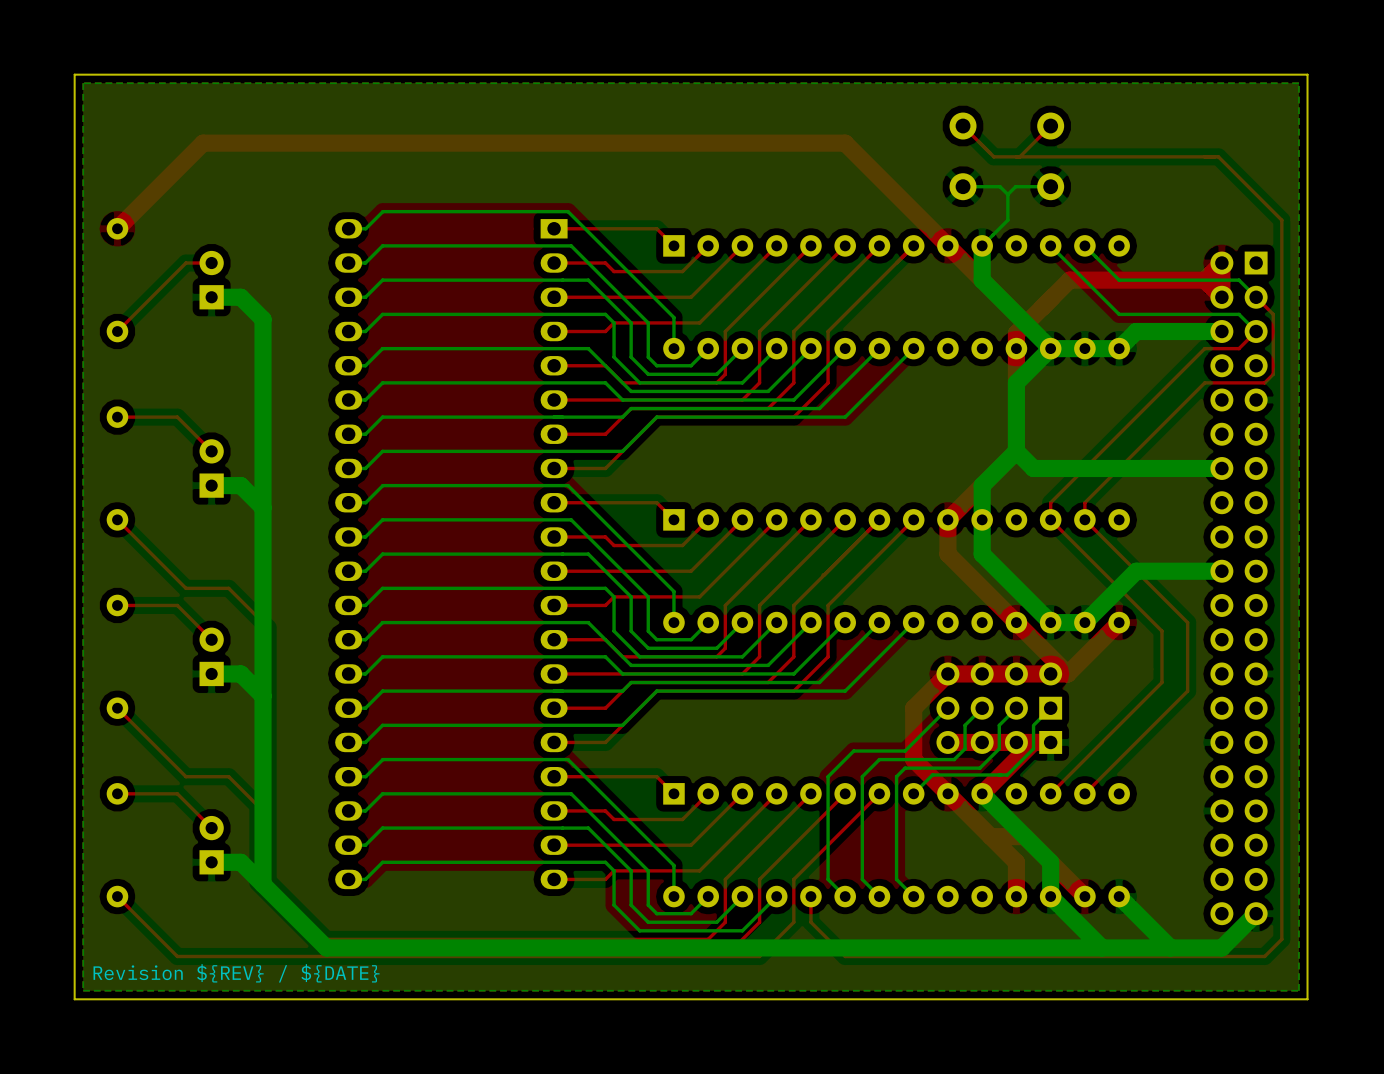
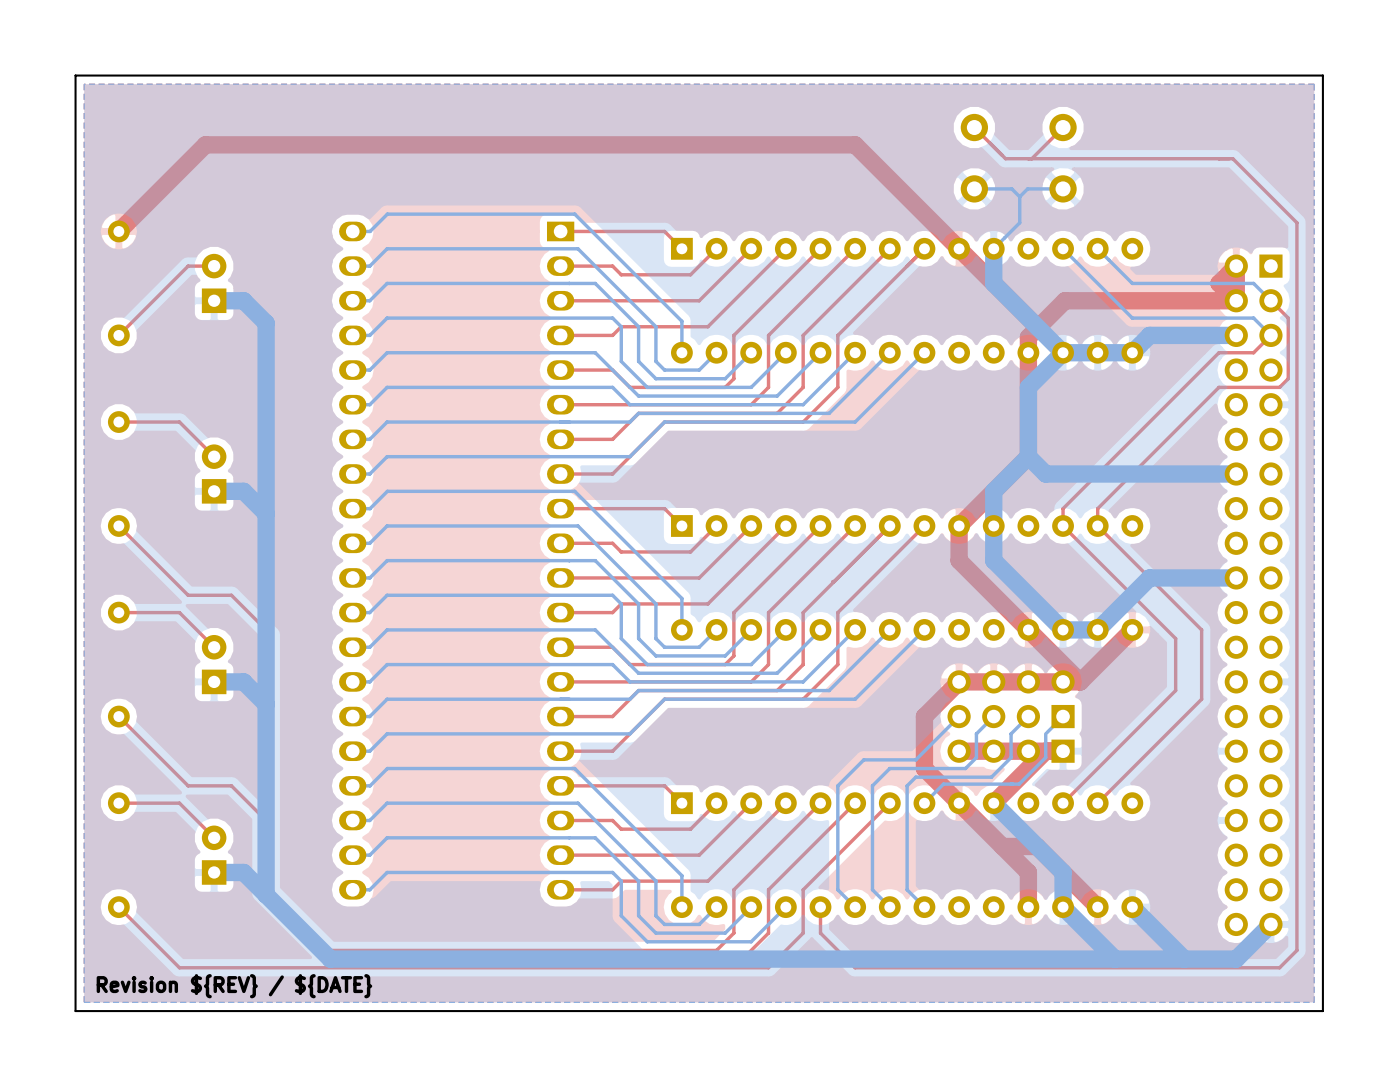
top track: (1221, 280) (1069, 280) (1052, 297) -> (1236, 300) (1064, 300)

